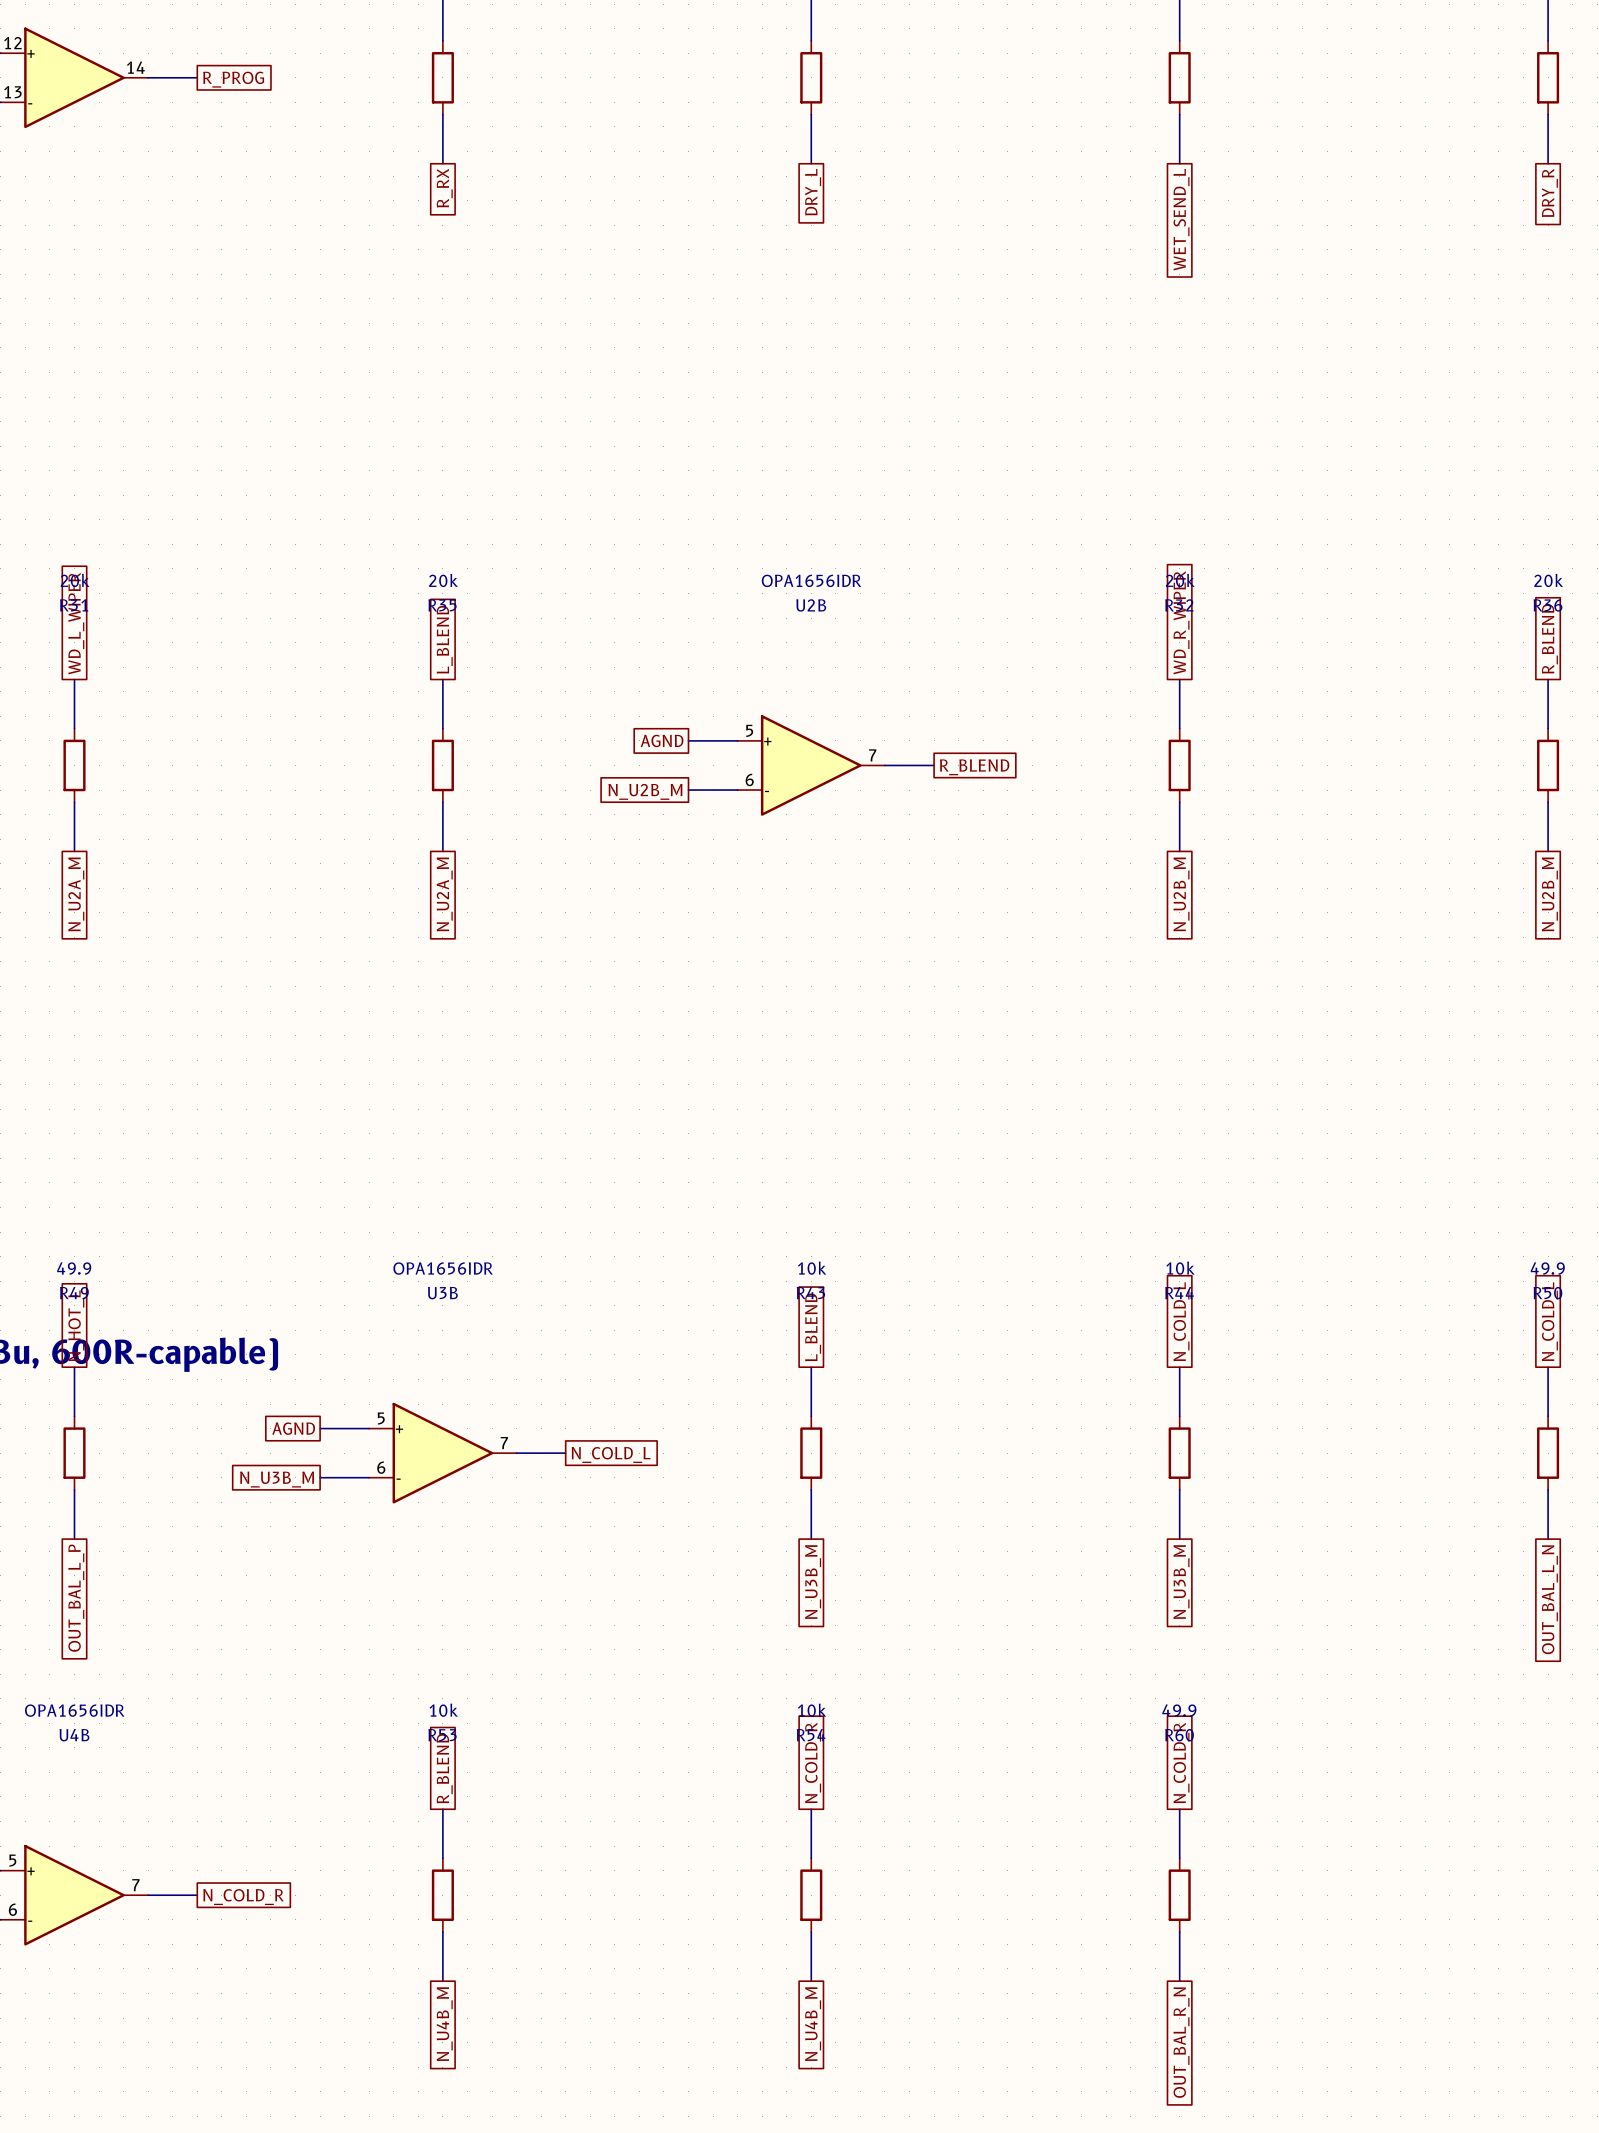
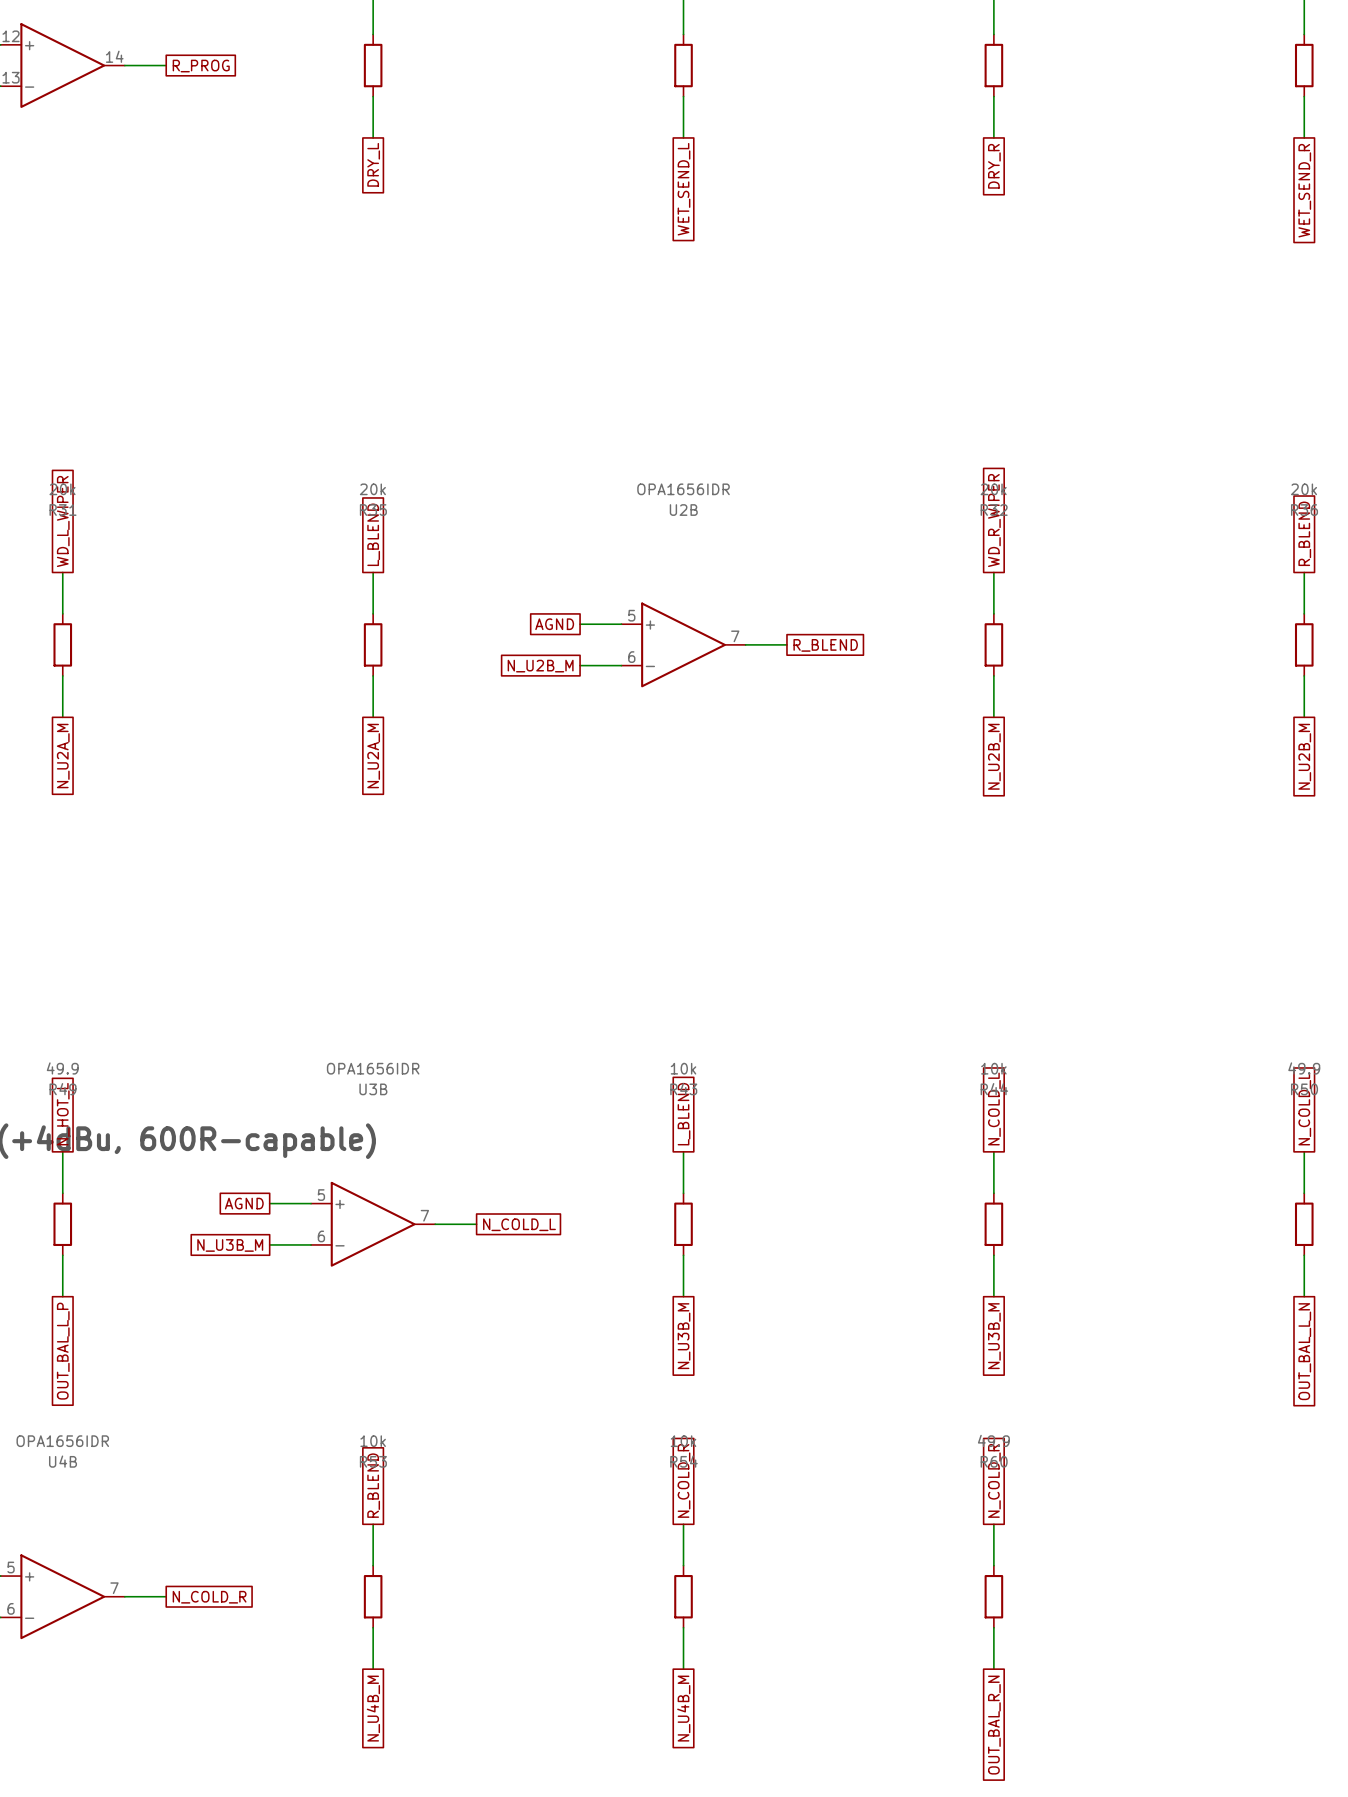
global label: R_RX (444, 188) -> DRY_L (373, 164)
global label: DRY_L (813, 192) -> WET_SEND_L (684, 189)
global label: DRY_R (1549, 192) -> WET_SEND_R (1304, 190)
global label: WET_SEND_L (1181, 219) -> DRY_R (994, 166)

